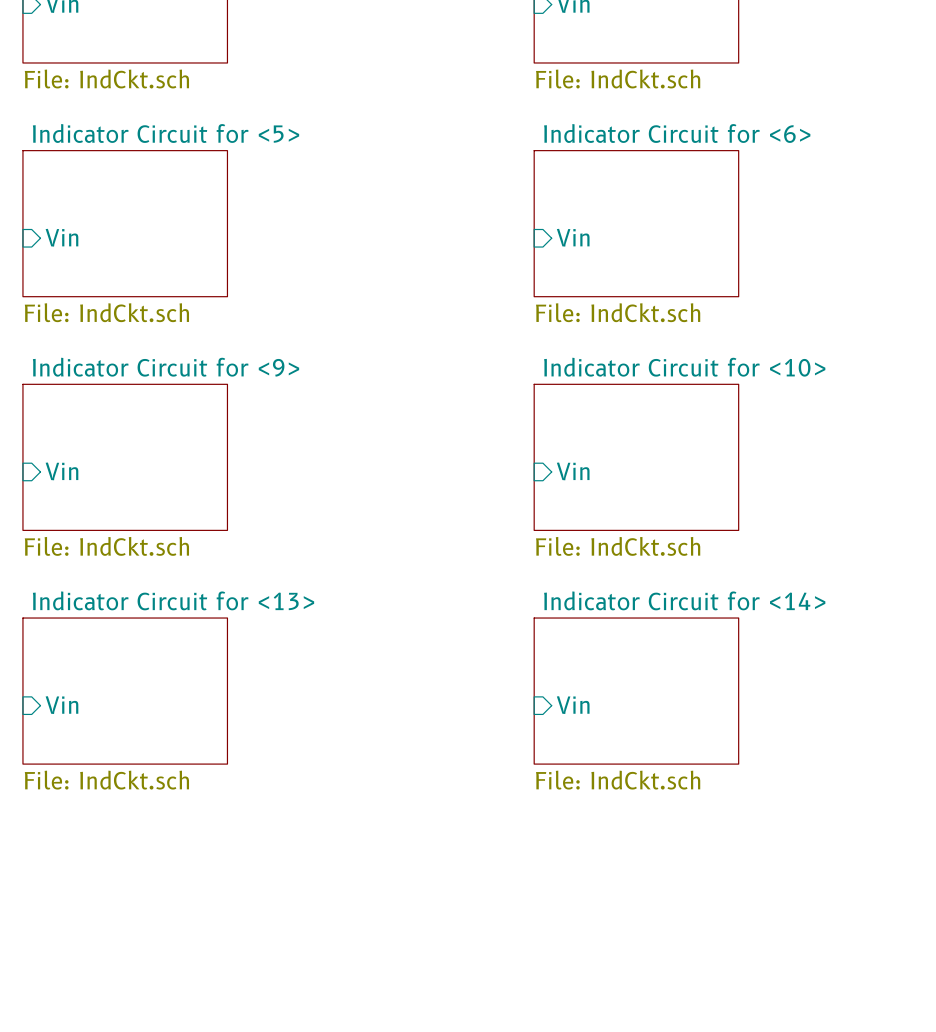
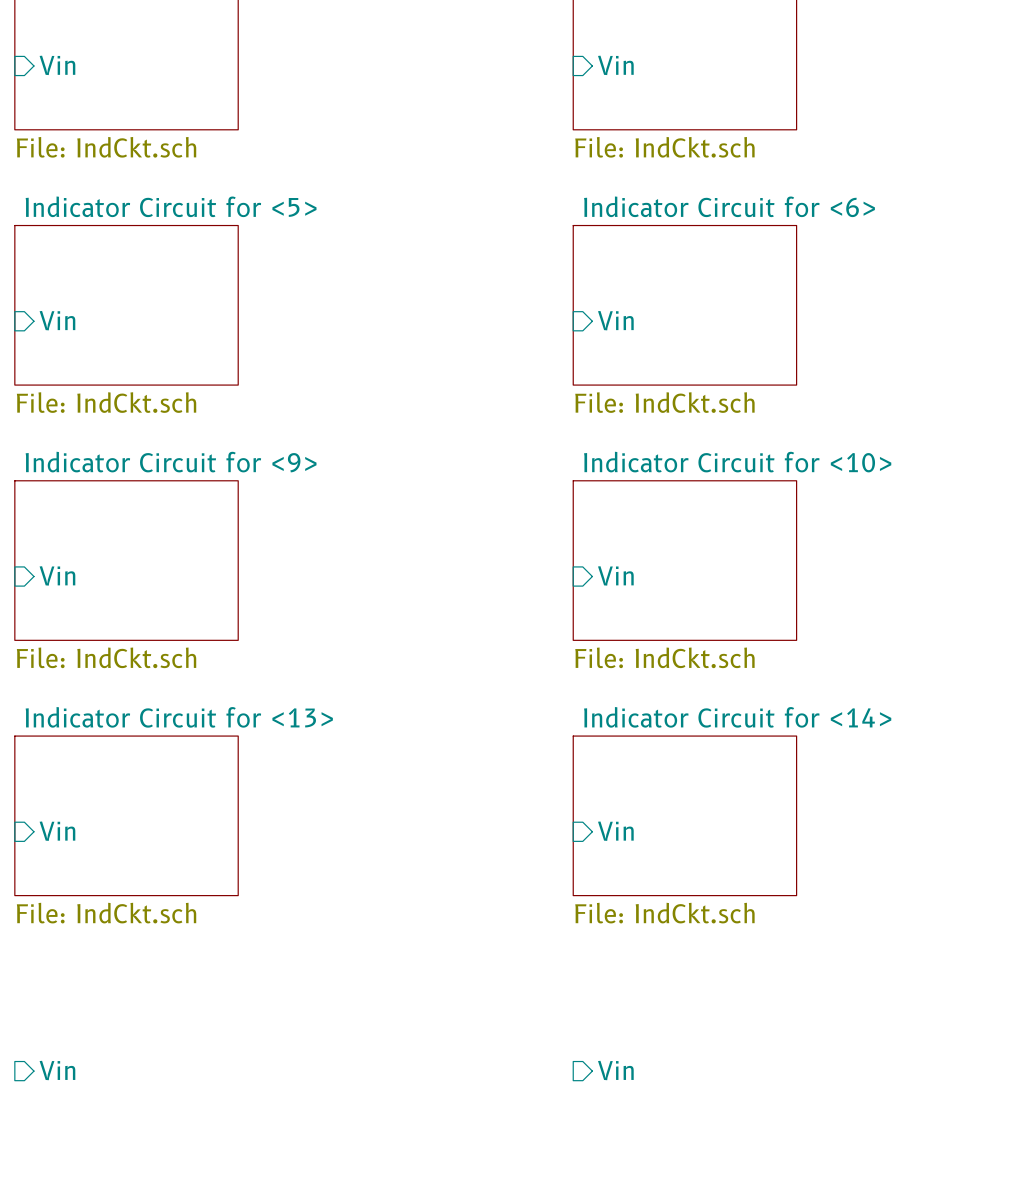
sheet pin: none -> Vin (57, 1070)
sheet pin: none -> Vin (615, 1070)

